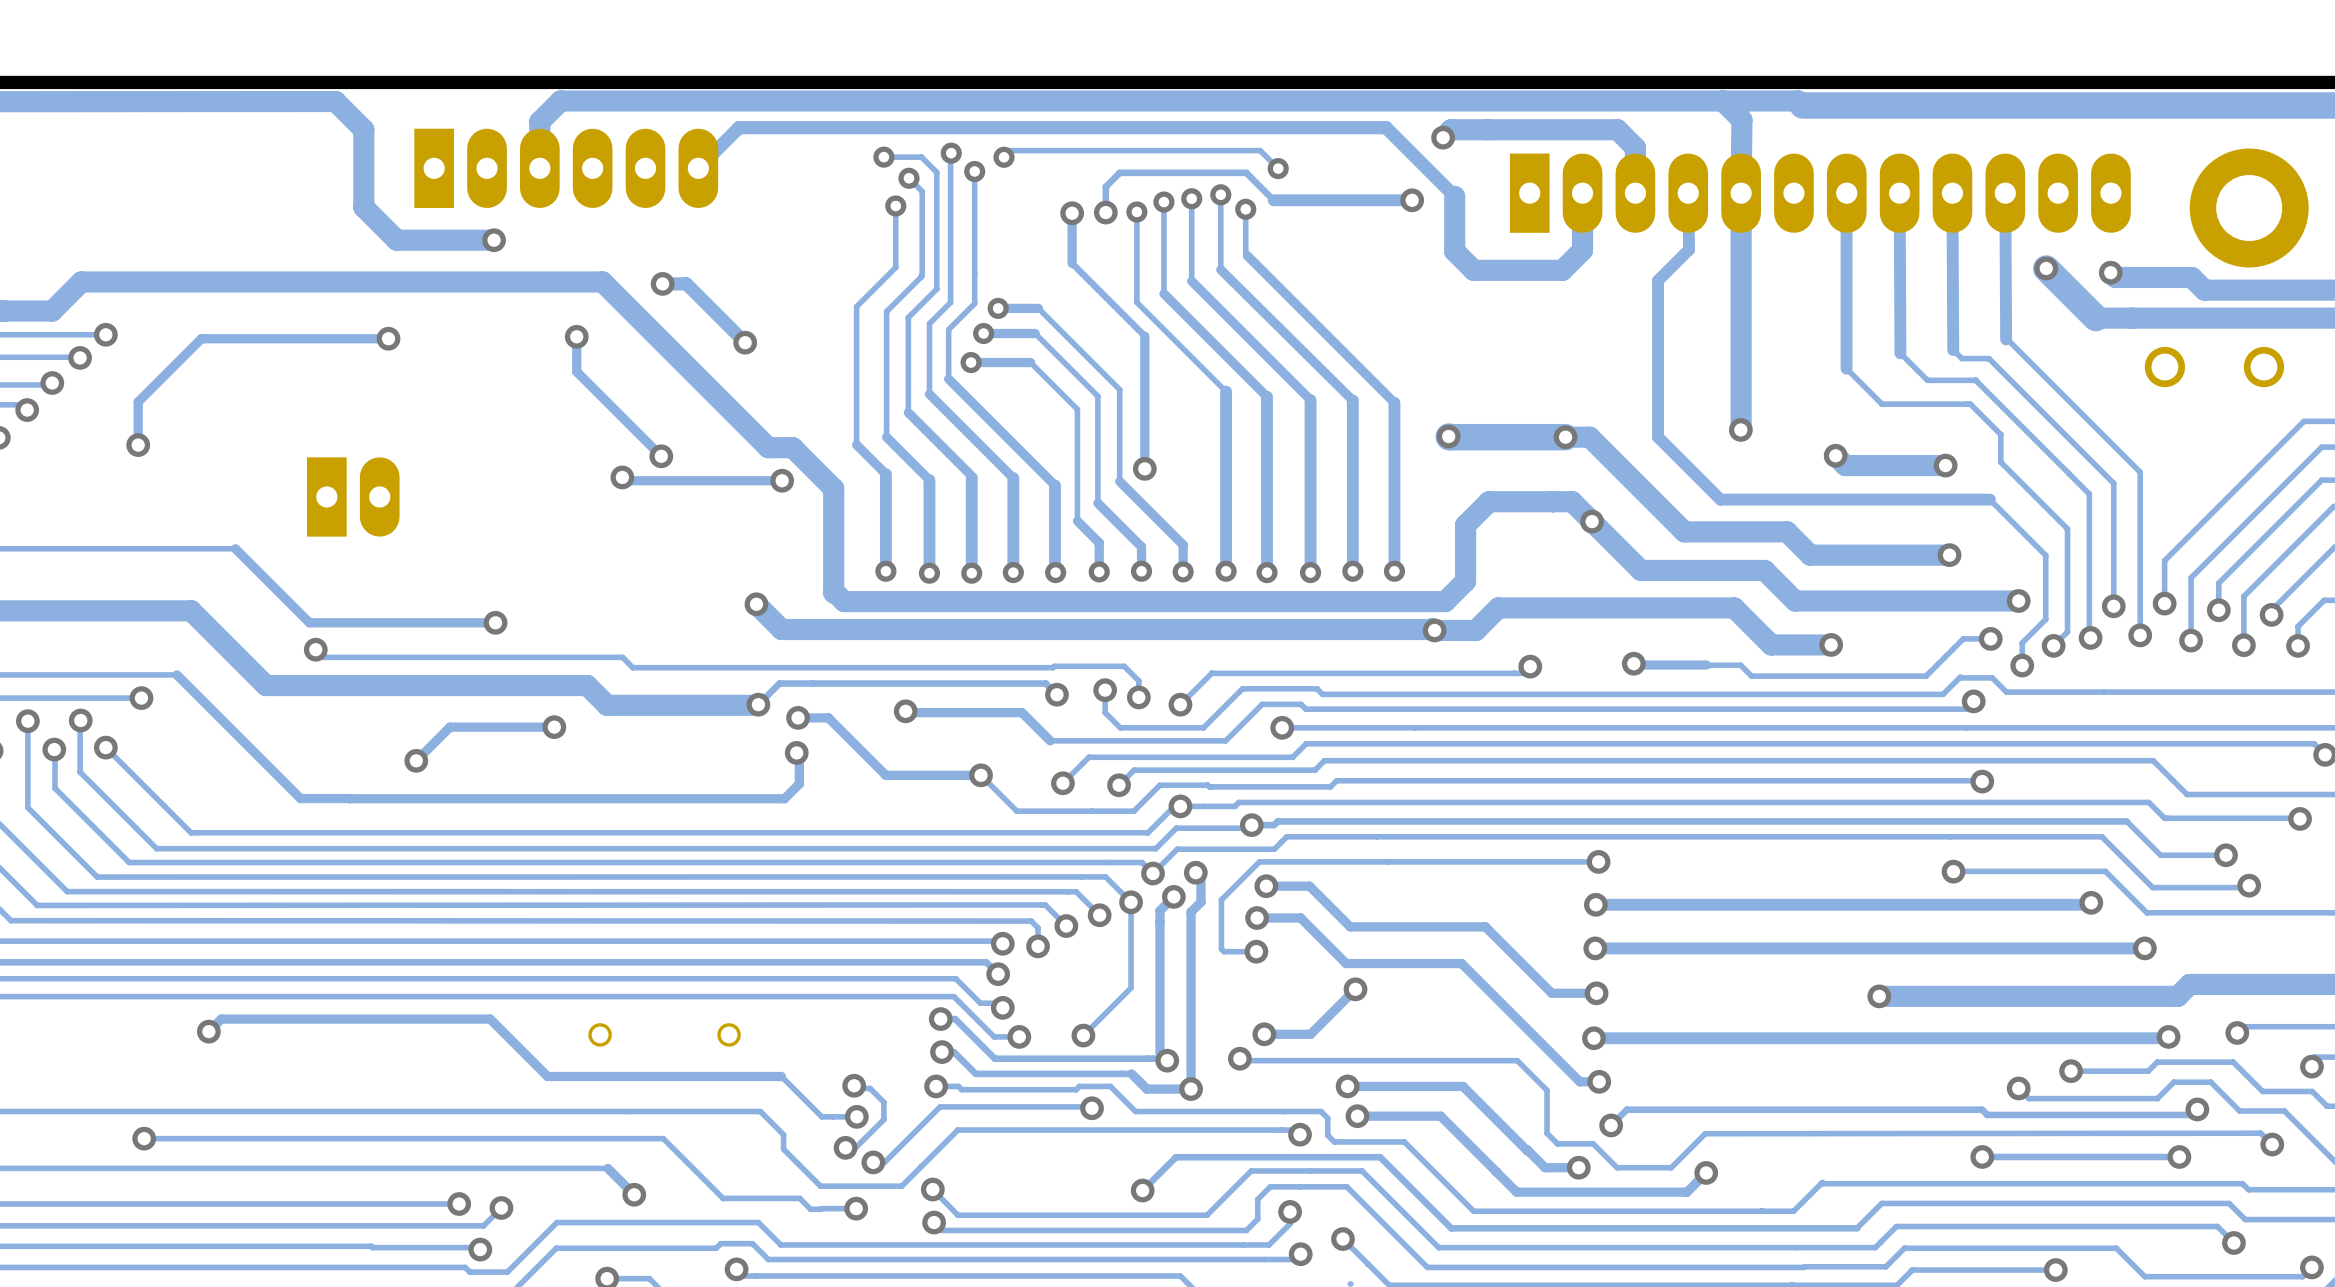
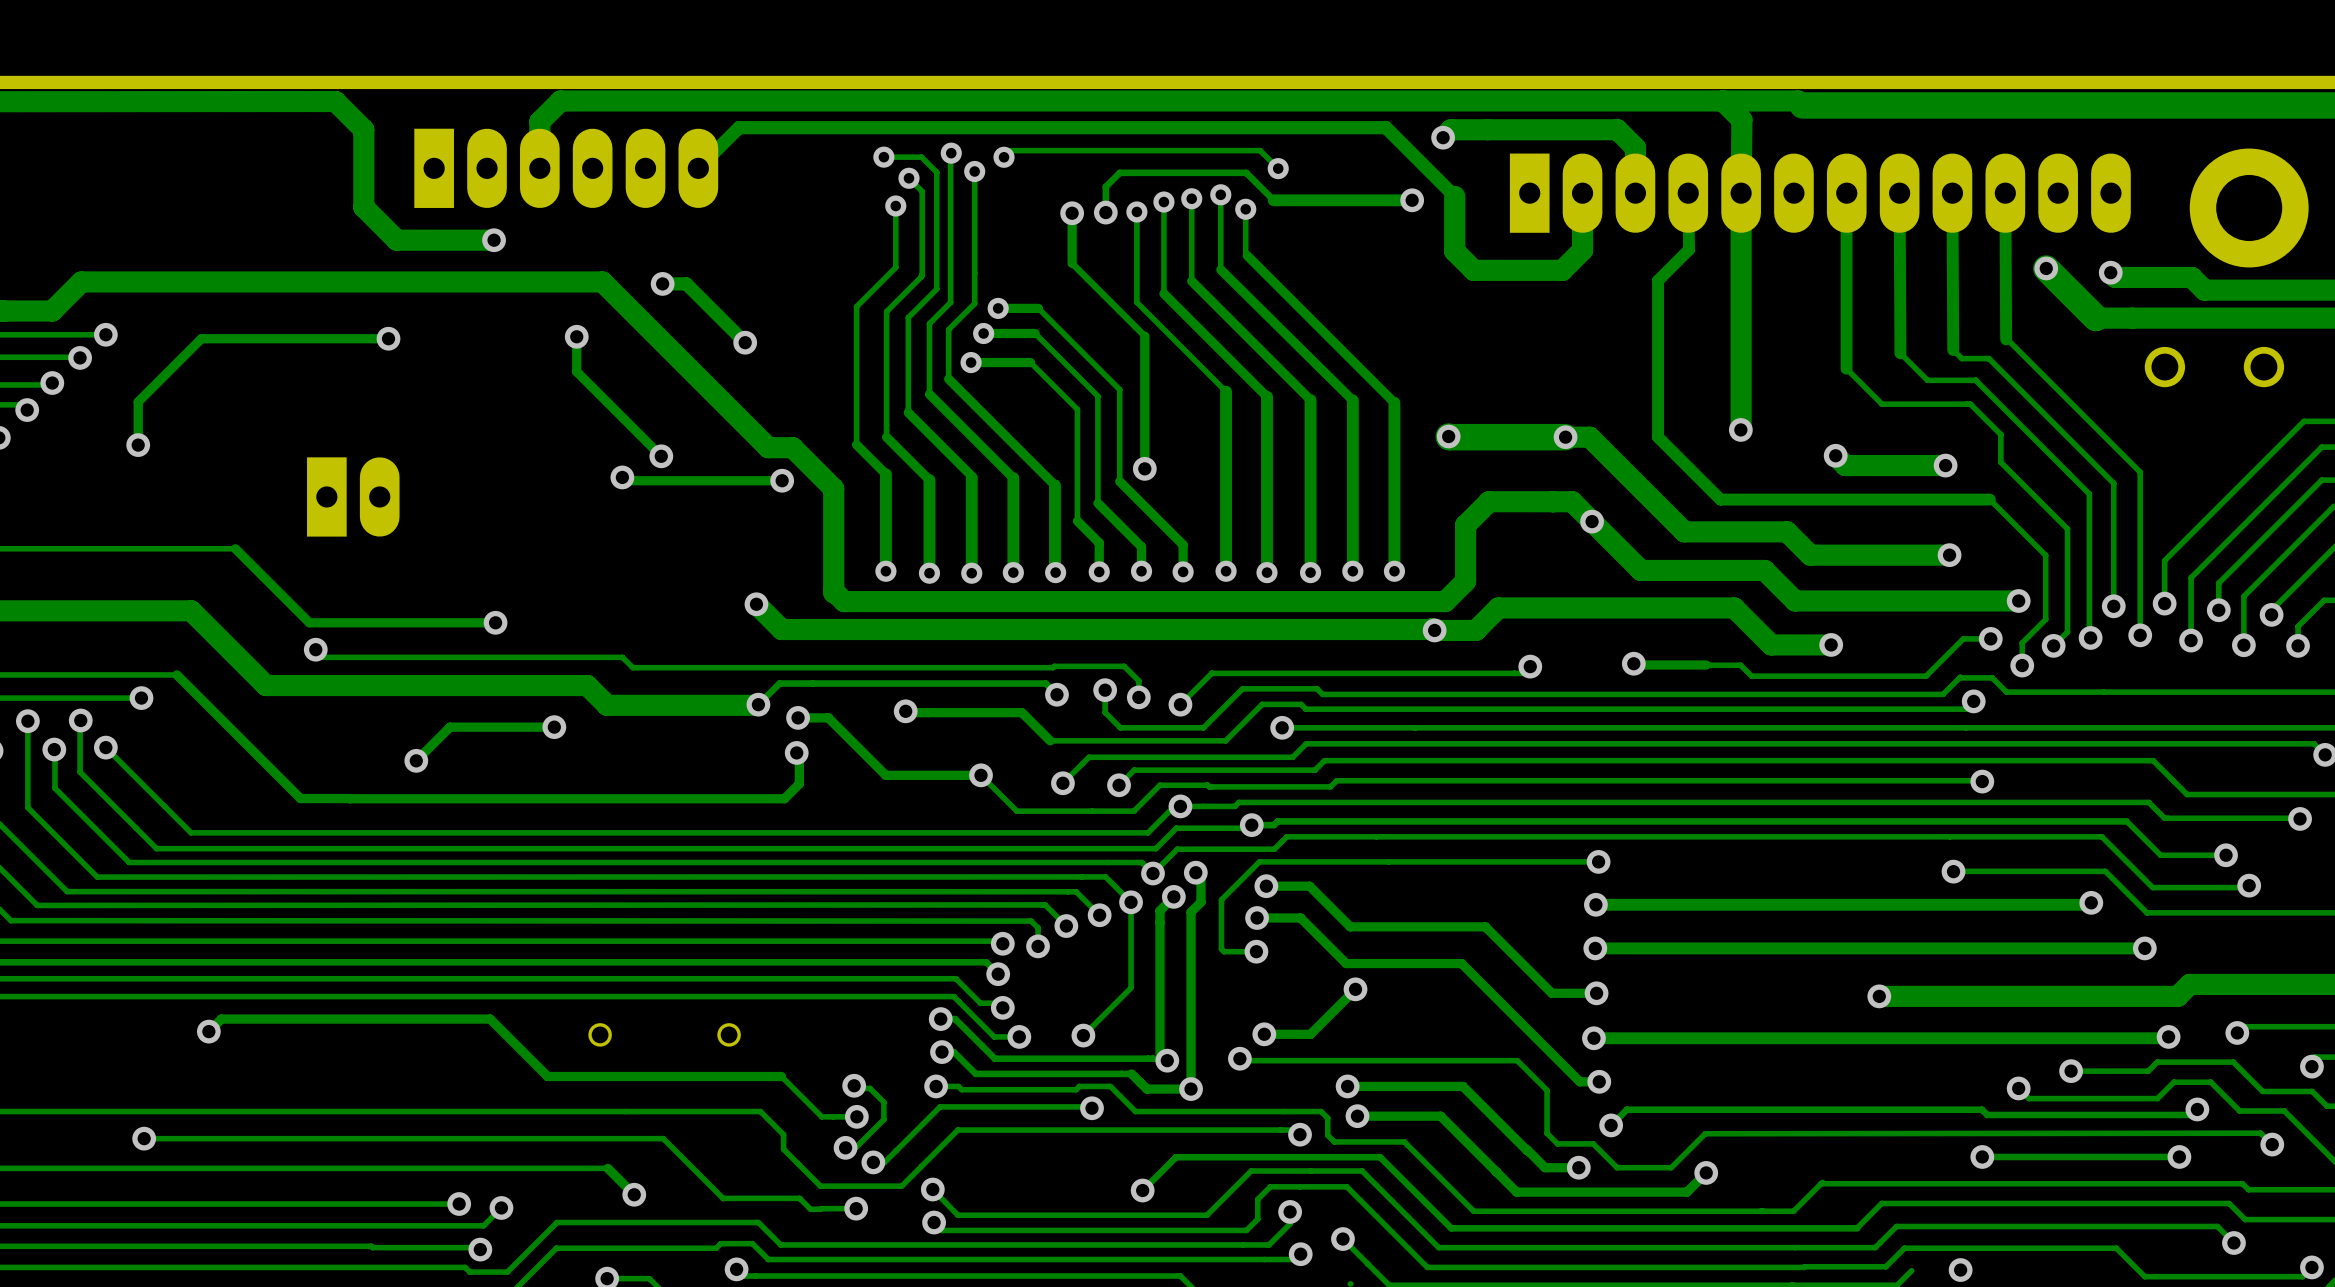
via: none -> (1960, 1270)
track: (2055, 1270) (1911, 1270) -> none
via: (2055, 1270) -> none

